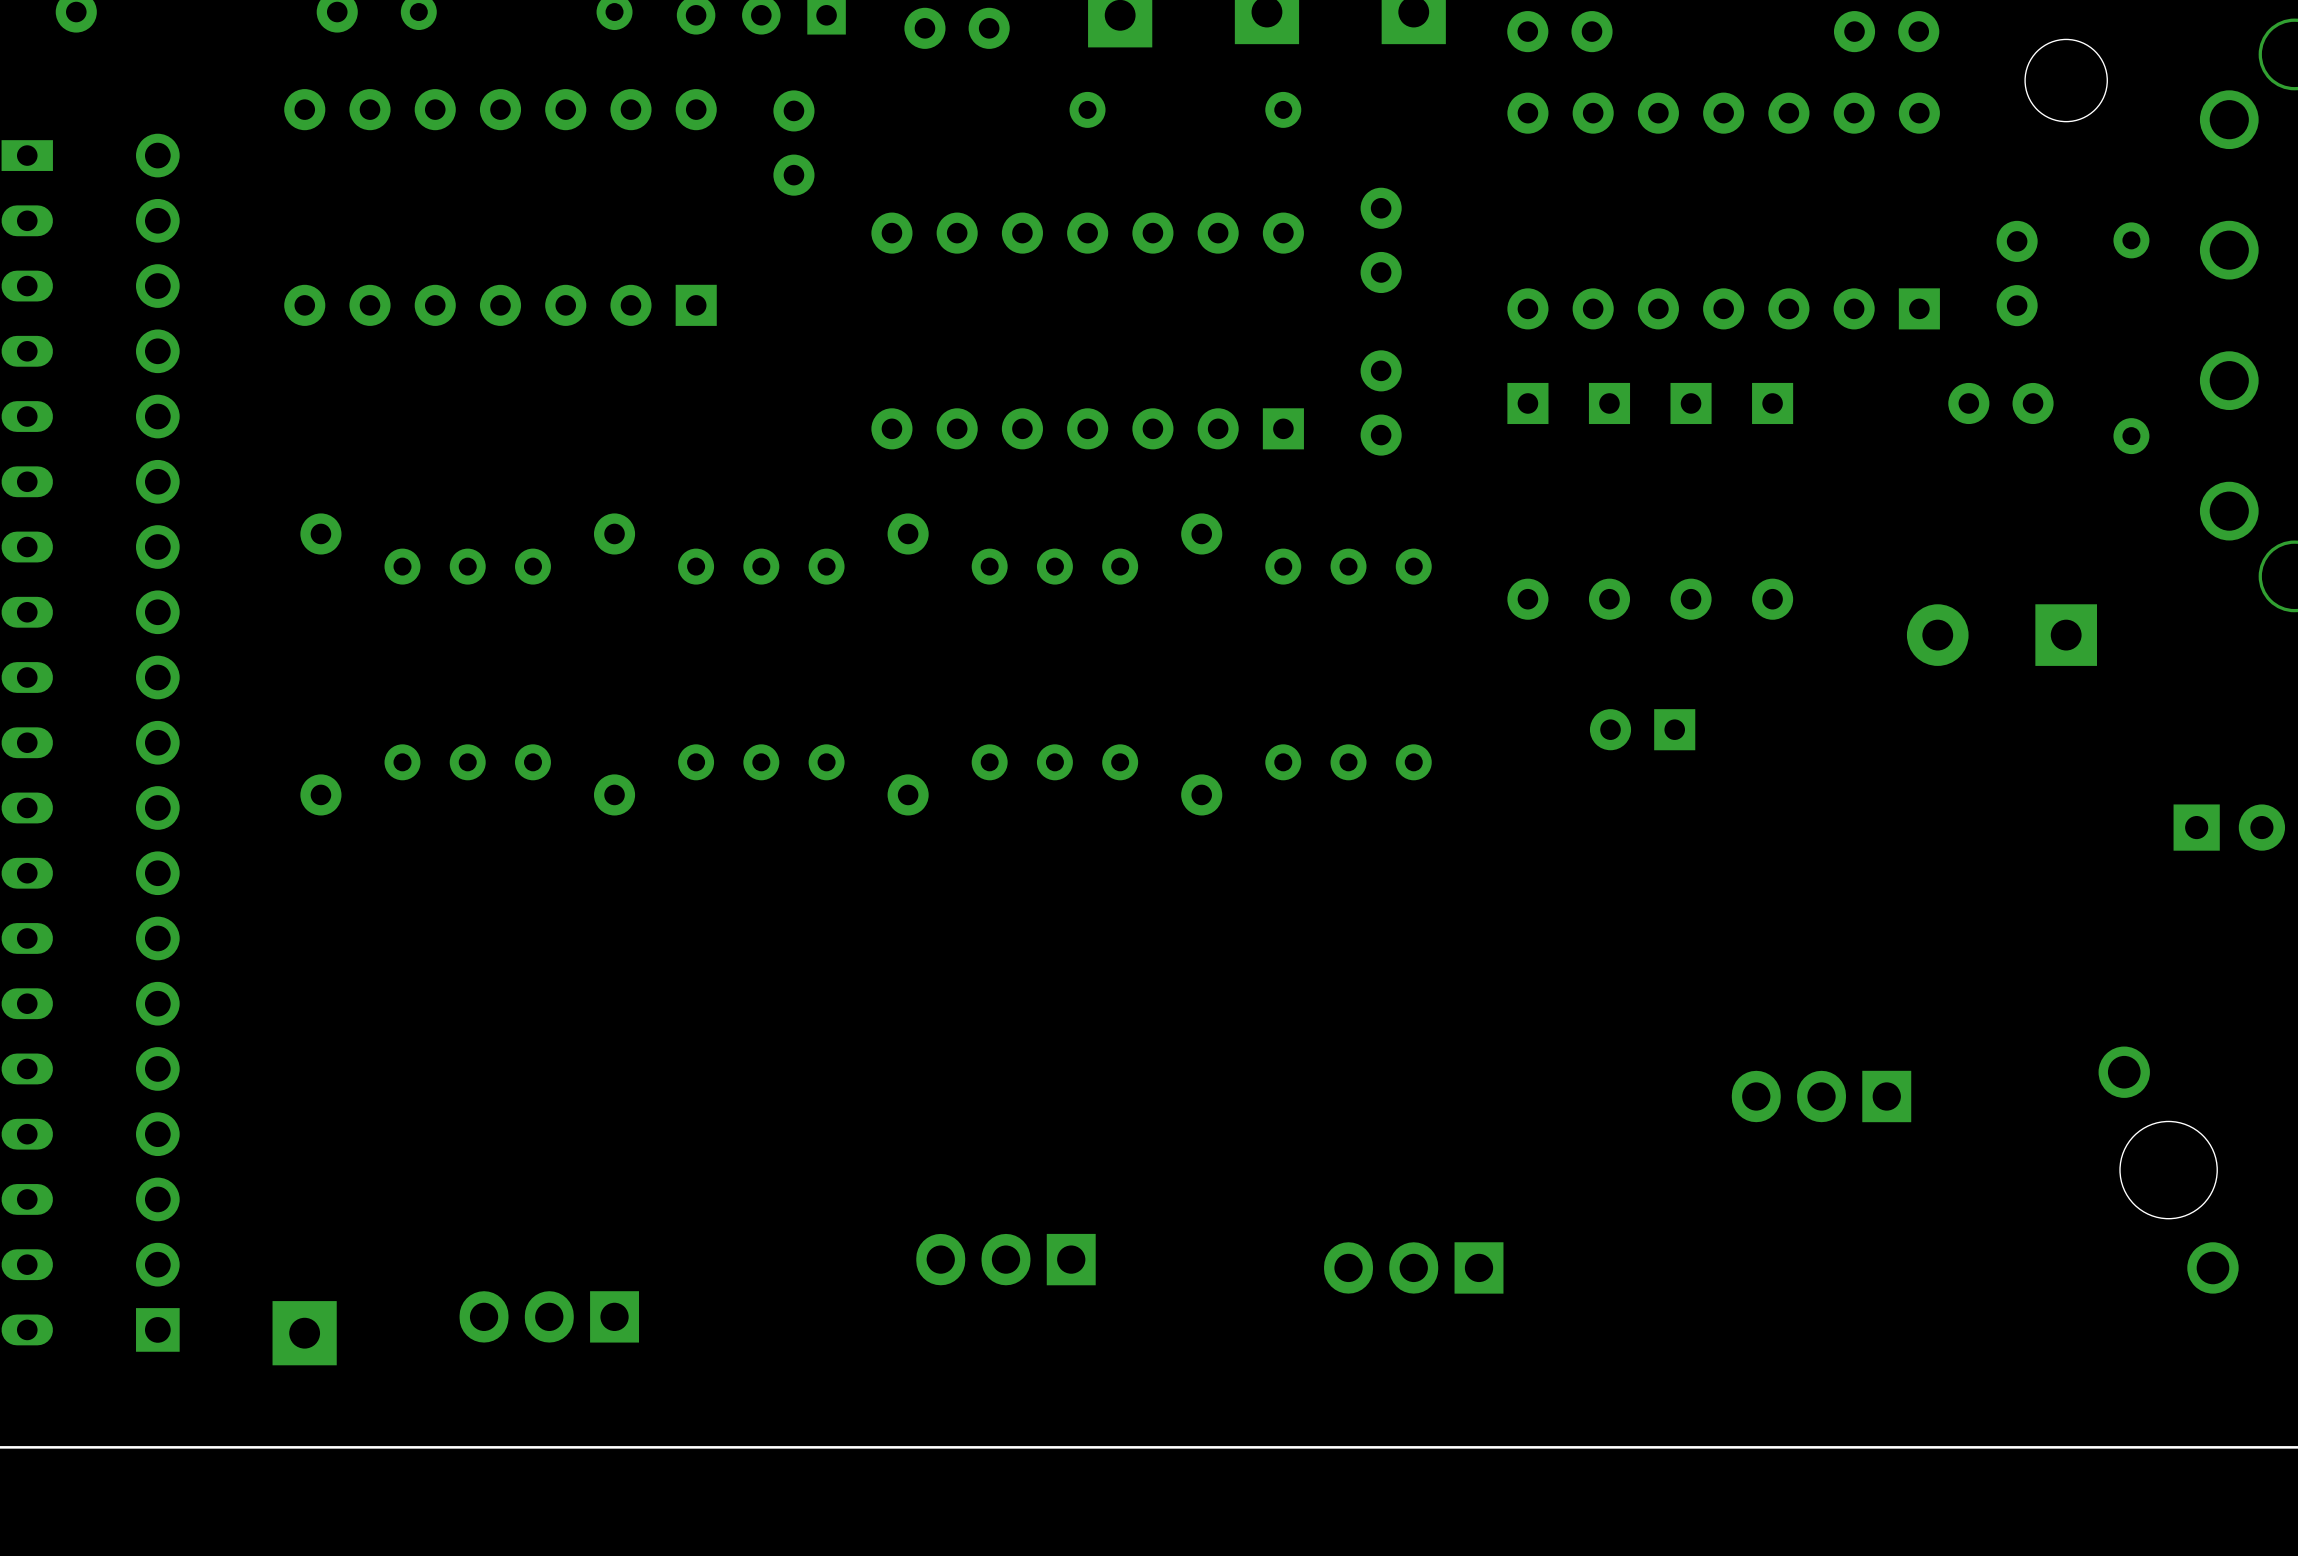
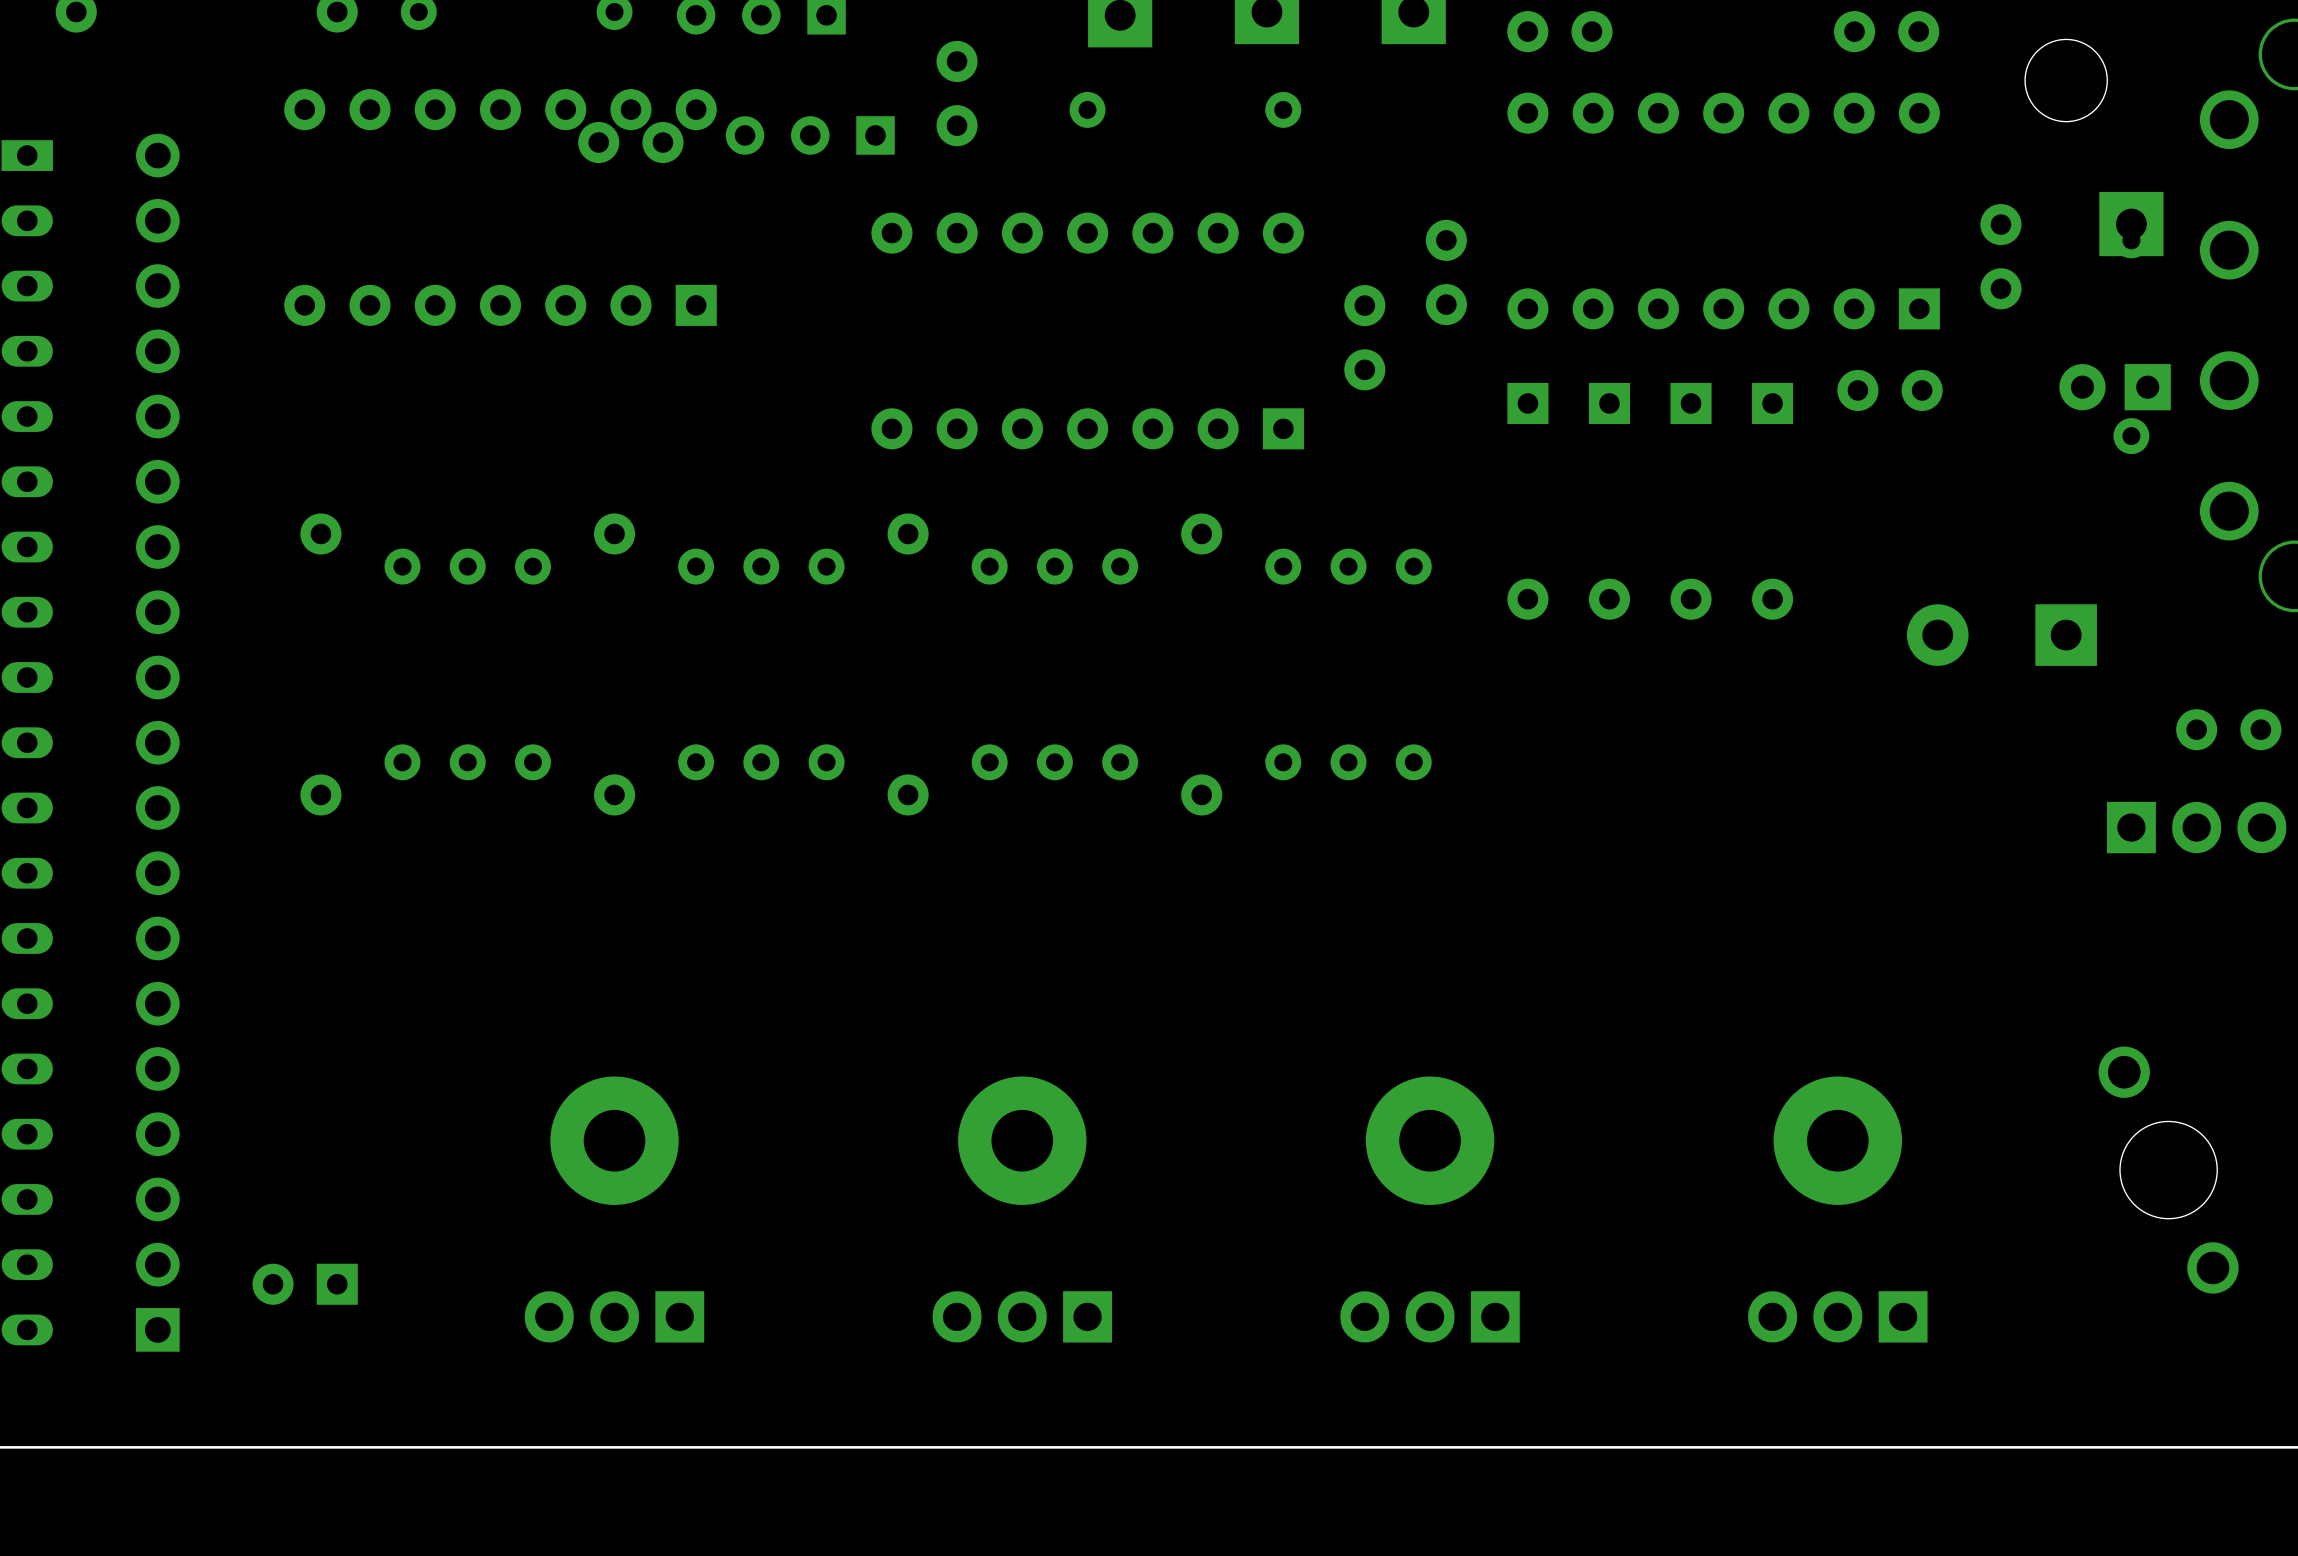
part rotation: 0° (957, 28) -> 90° clockwise (957, 93)
part position: (957, 28) -> (957, 93)
part footprint: [773, 90, 815, 196] -> [725, 116, 895, 155]
part: none -> (630, 142)
part: none -> (2131, 224)
part: (1381, 240) -> none
part: none -> (1446, 272)
part position: (2017, 273) -> (2000, 256)
part: none -> (1364, 337)
part: (1381, 402) -> none
part position: (2000, 403) -> (1890, 390)
part: (1642, 729) -> none
part: none -> (2228, 729)
part: none -> (2196, 827)
part rotation: 0° (2229, 827) -> 180° (2115, 387)
part position: (2229, 827) -> (2115, 387)
part: (1821, 1096) -> none
part: none -> (614, 1140)
part: none -> (1022, 1140)
part: none -> (1430, 1140)
part: none -> (1837, 1140)
part position: (1005, 1259) -> (1022, 1316)
part position: (1413, 1267) -> (1430, 1316)
part: none -> (305, 1284)
part position: (549, 1316) -> (614, 1316)
part: none -> (1837, 1316)
part: (304, 1333) -> none

